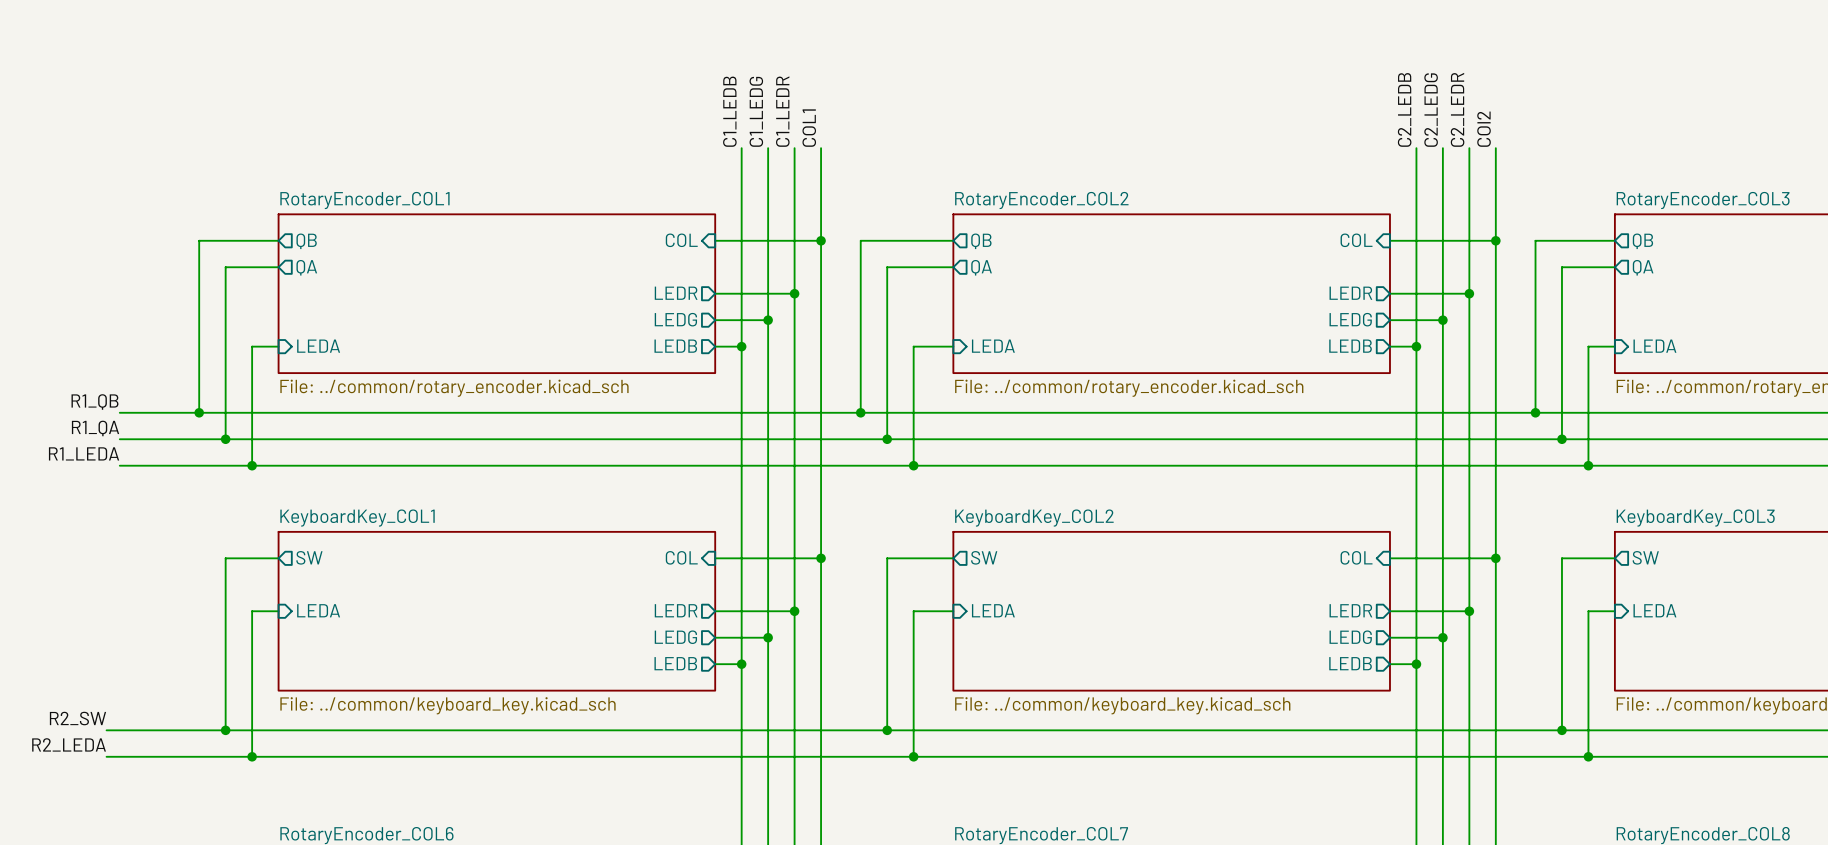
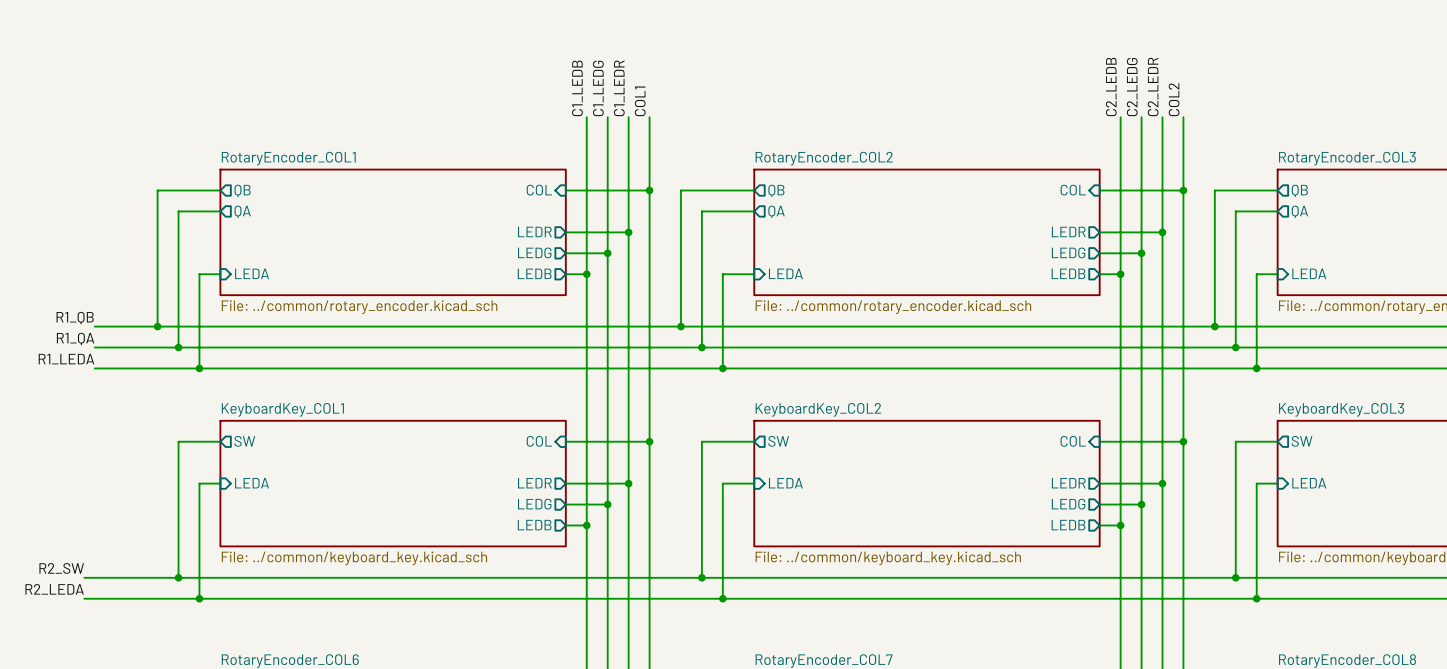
label: COl2 (1484, 129) -> COL2 (1174, 99)

